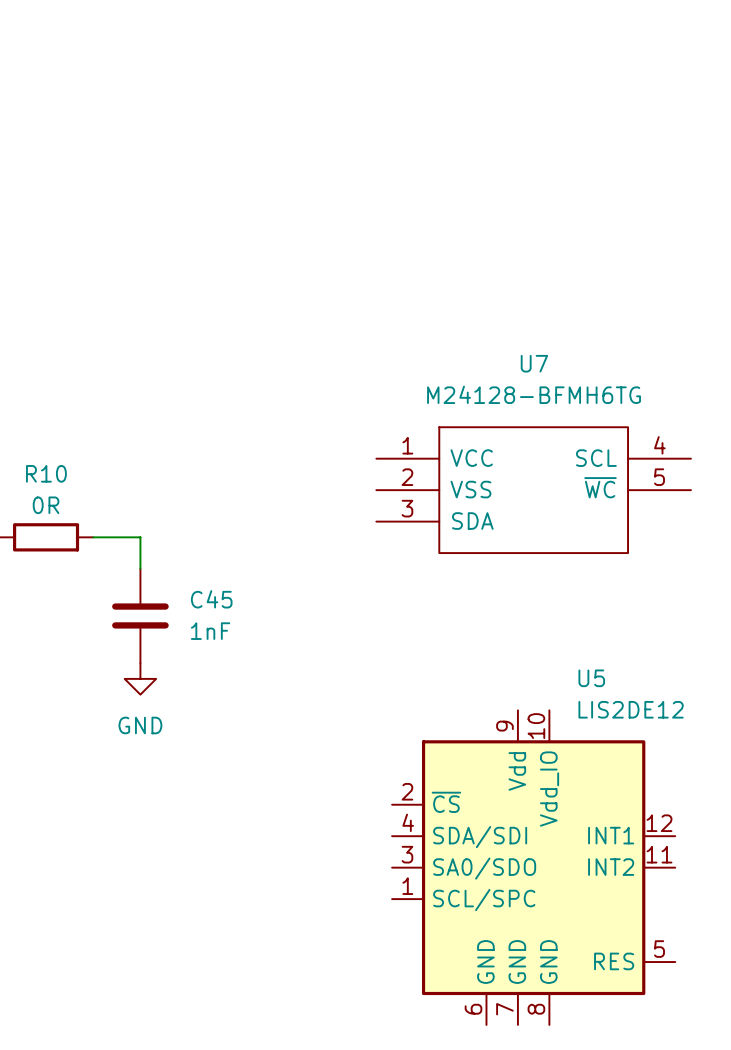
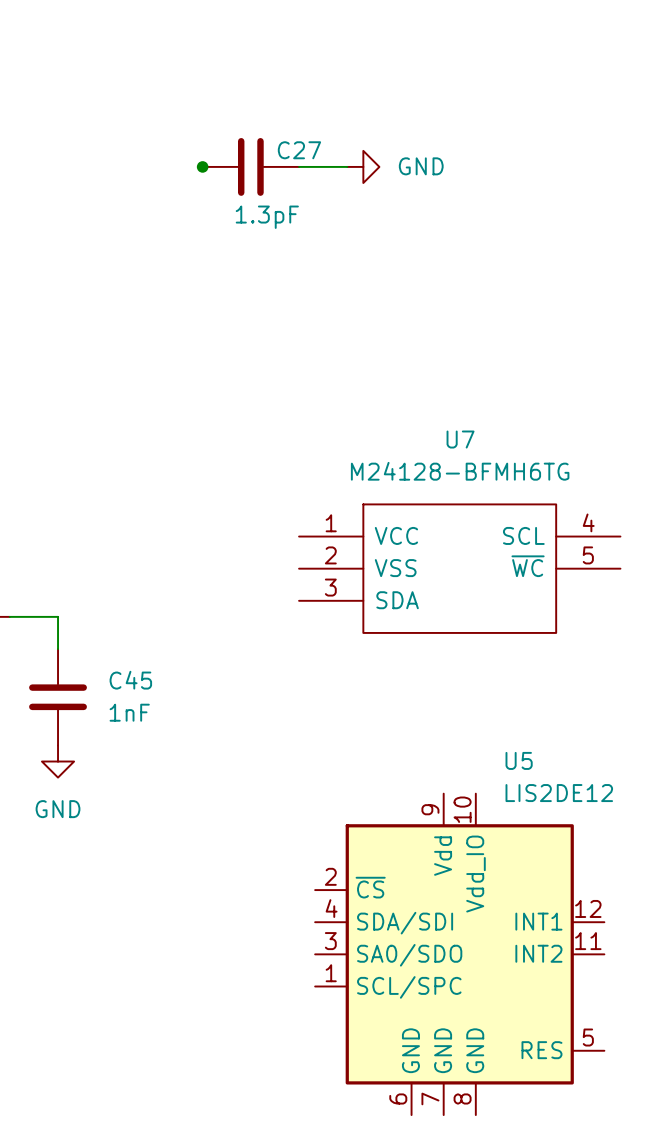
junction: none -> (202, 166)
C27: none -> 1.3pF (250, 166)
wire: none -> (299, 166) (347, 166)
power symbol: none -> GND (363, 166)

